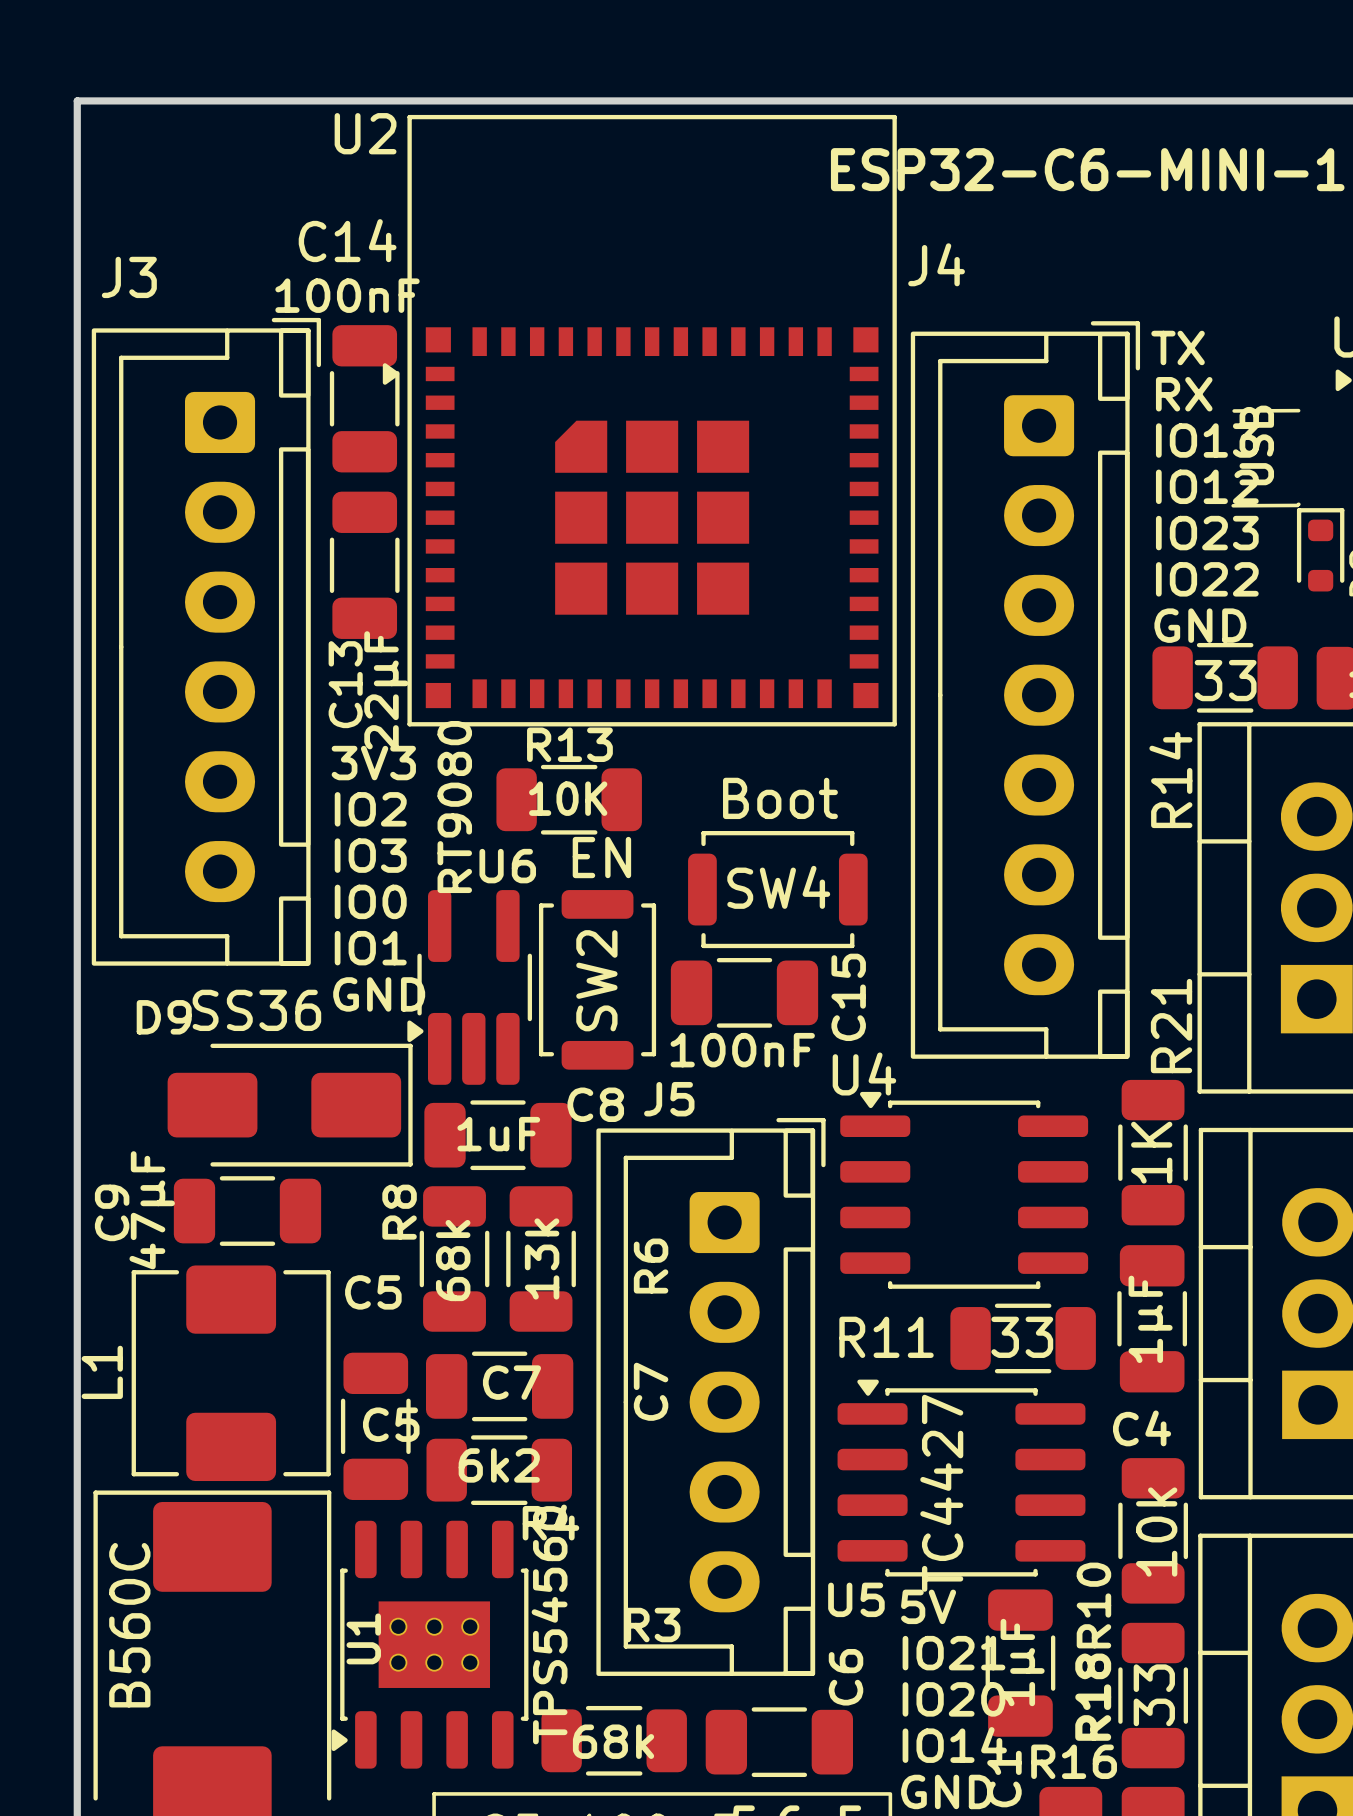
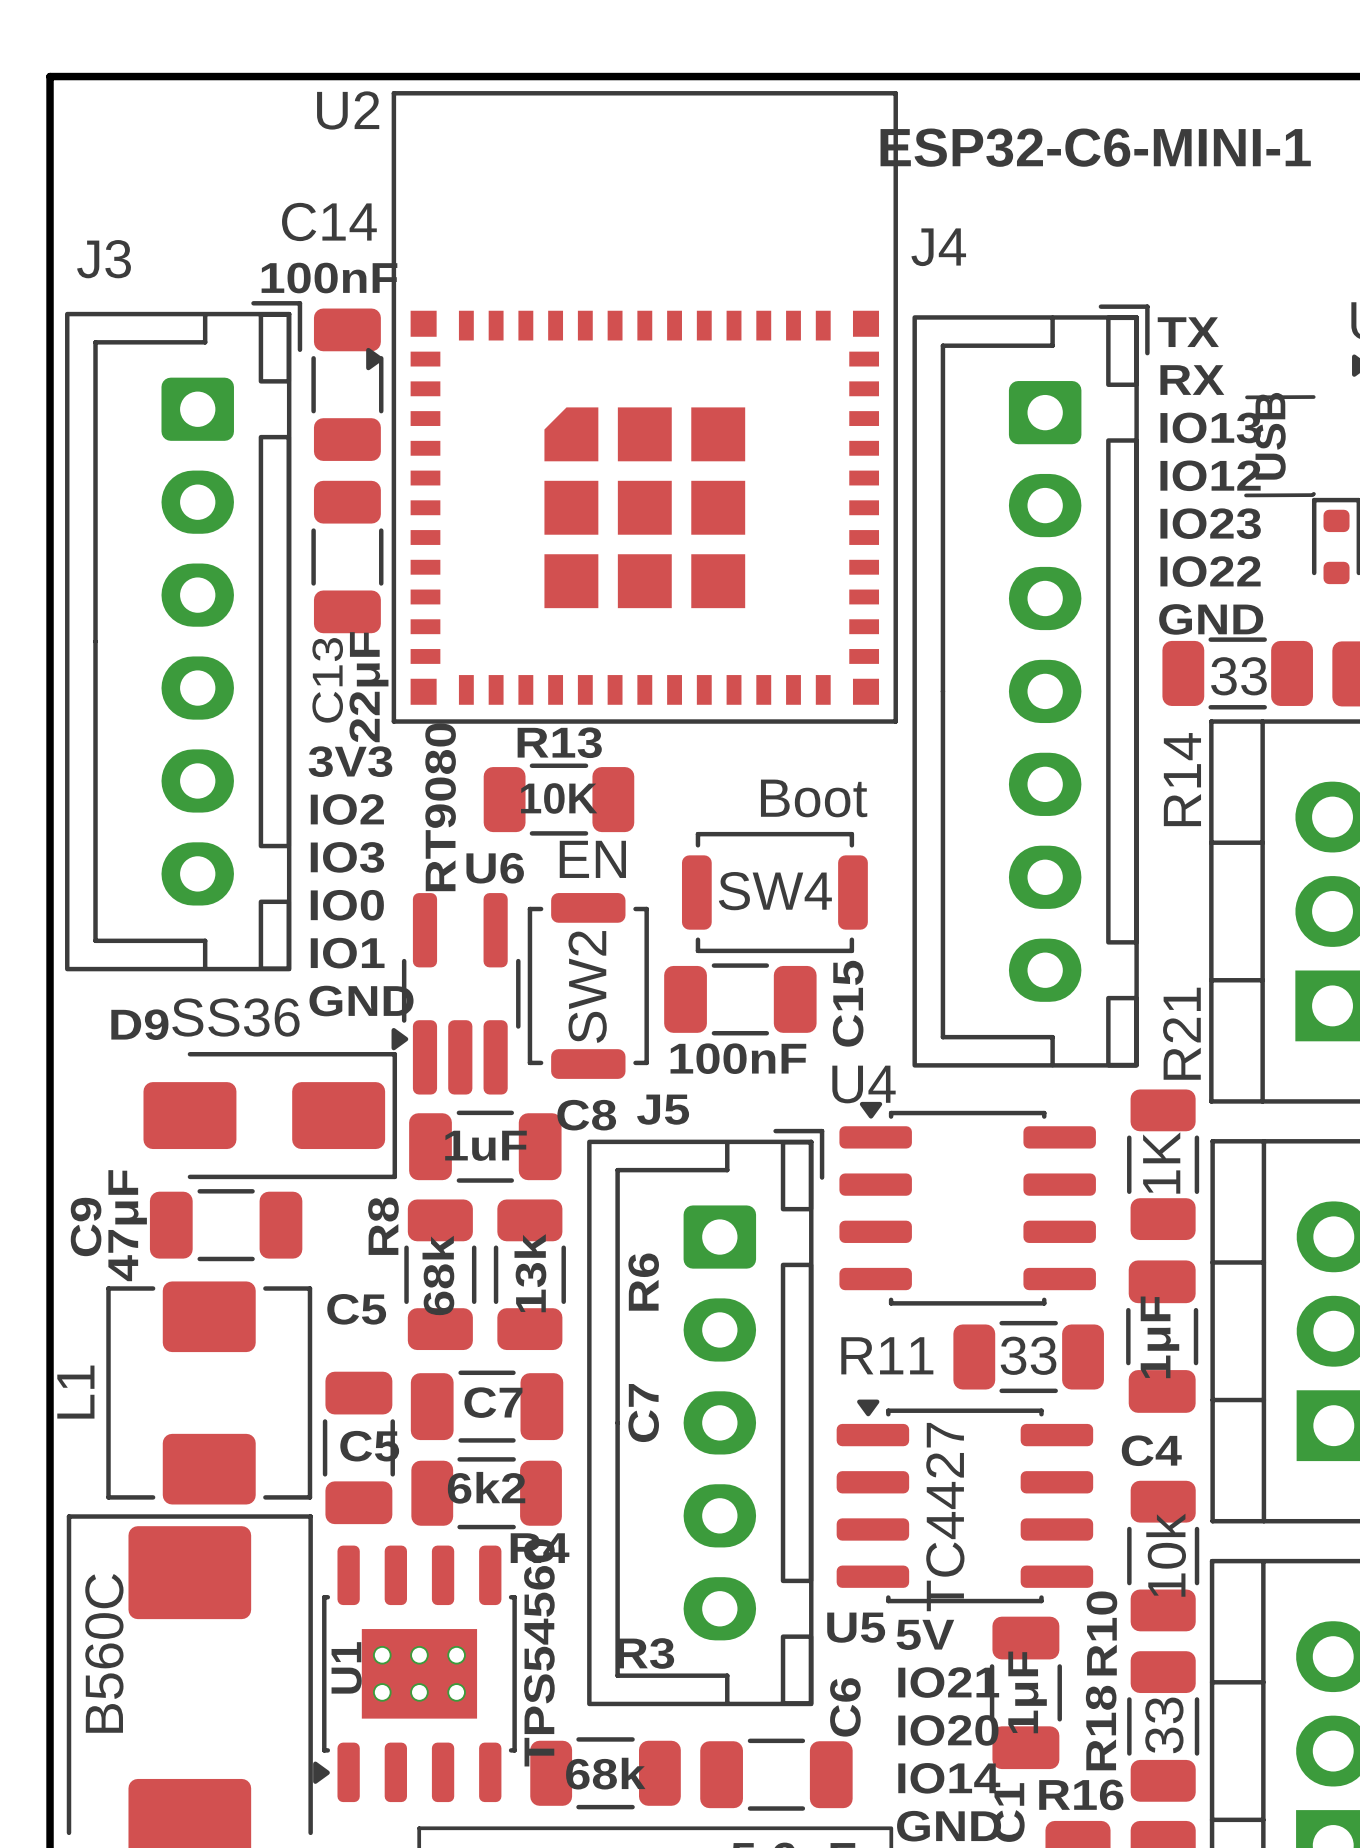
SW4 value position: Boot (780, 798) -> Boot (814, 798)

